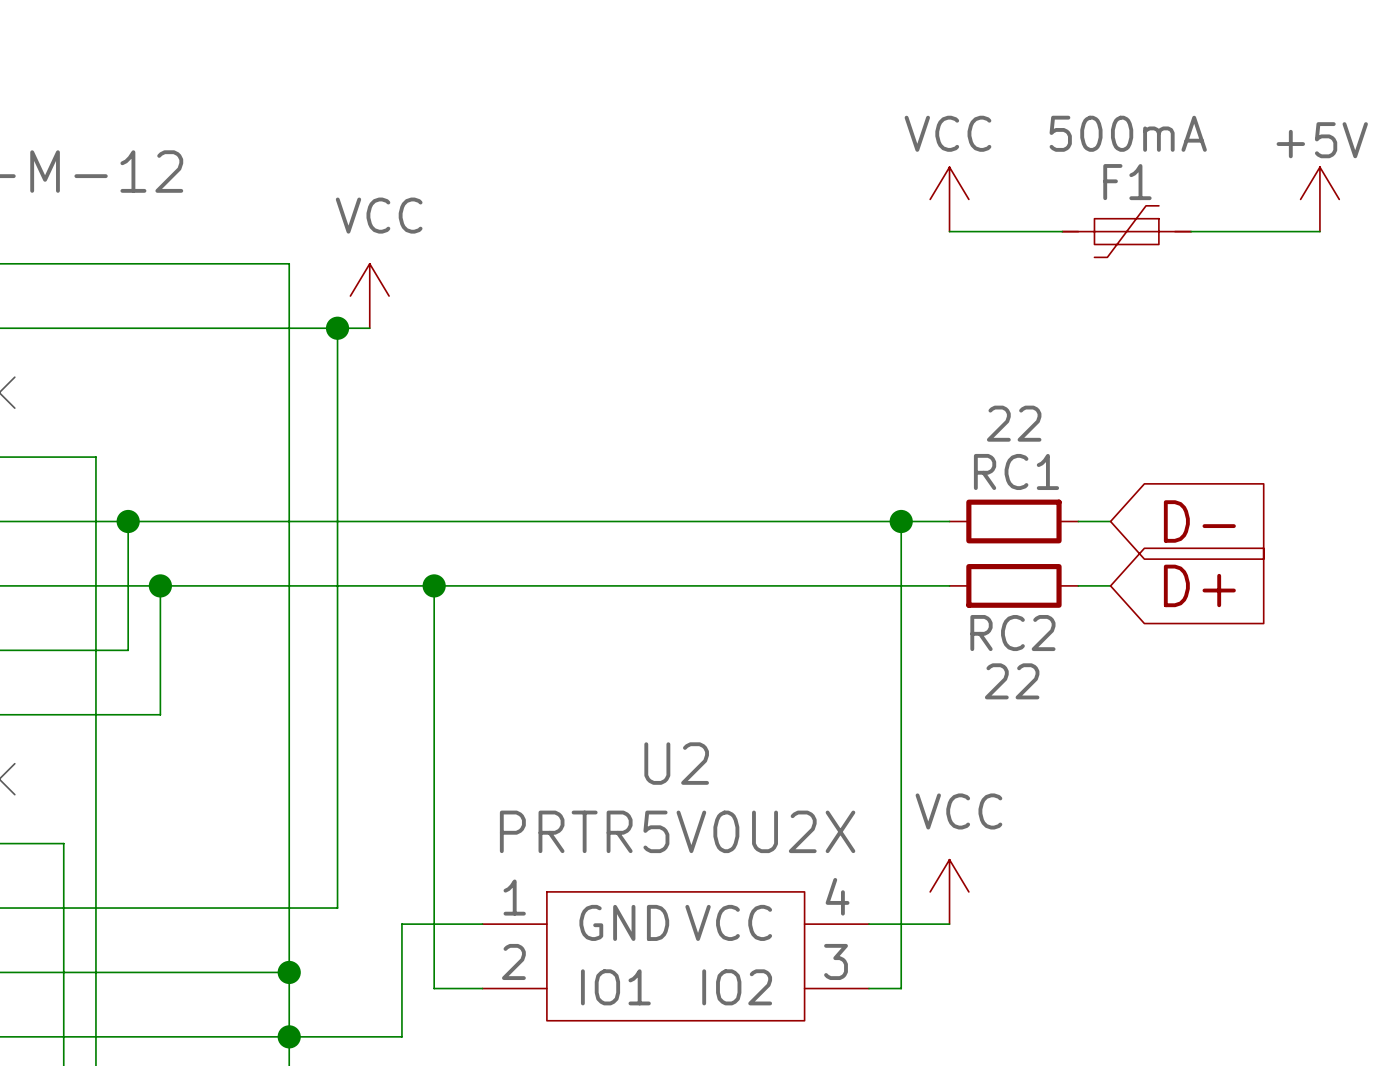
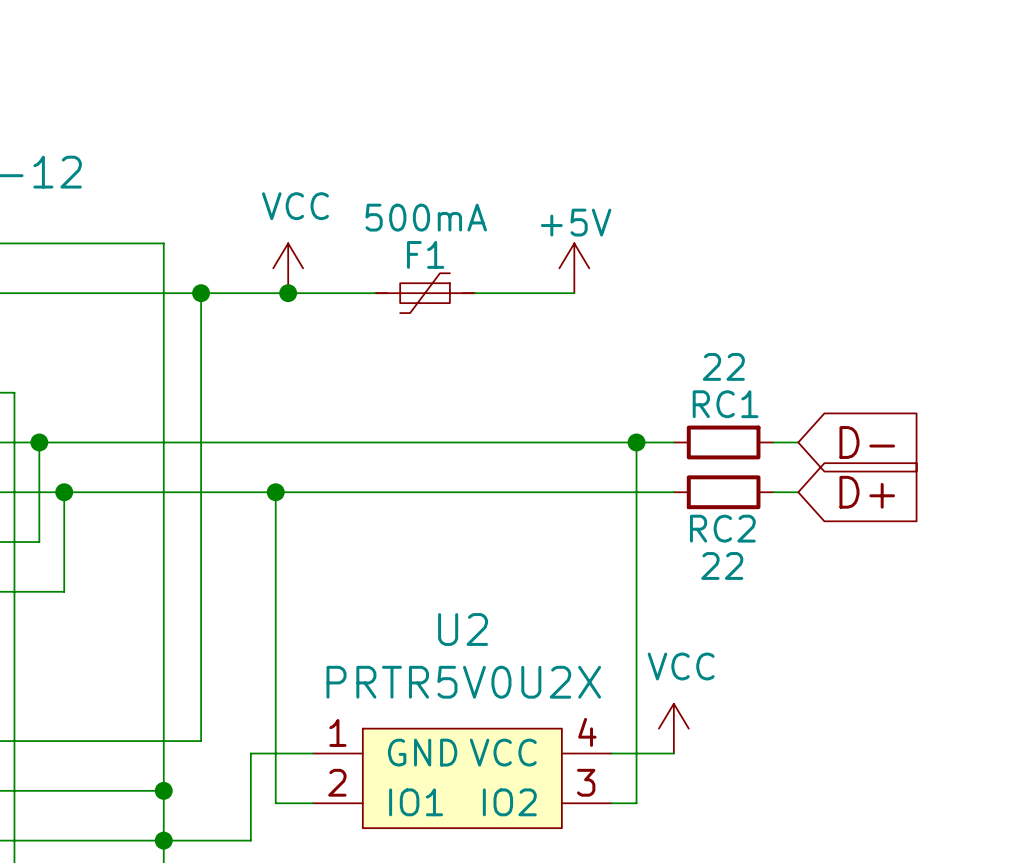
power symbol: VCC (949, 199) -> none
power symbol position: +5V (1319, 199) -> +5V (574, 268)
wire: (949, 231) (1062, 231) -> none
F1 position: (1126, 231) -> (425, 293)
wire: (1191, 231) (1319, 231) -> (474, 293) (574, 293)
power symbol position: VCC (369, 296) -> VCC (288, 268)
wire: none -> (225, 293) (375, 293)
junction: none -> (288, 293)

